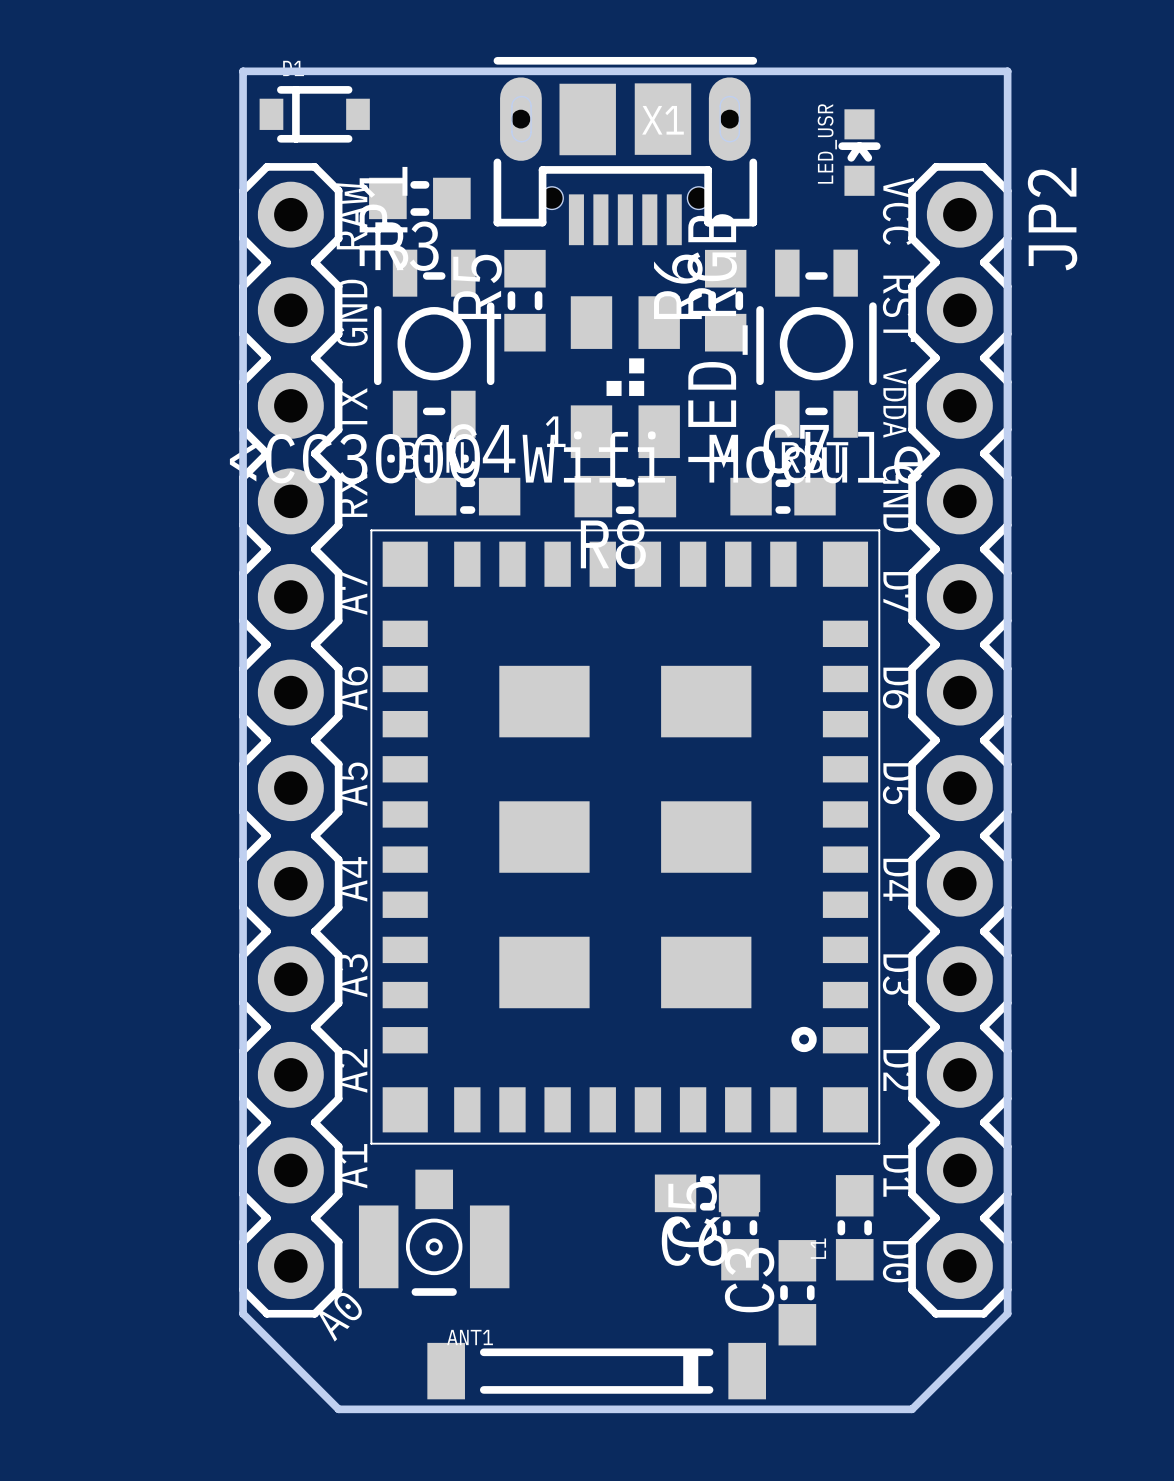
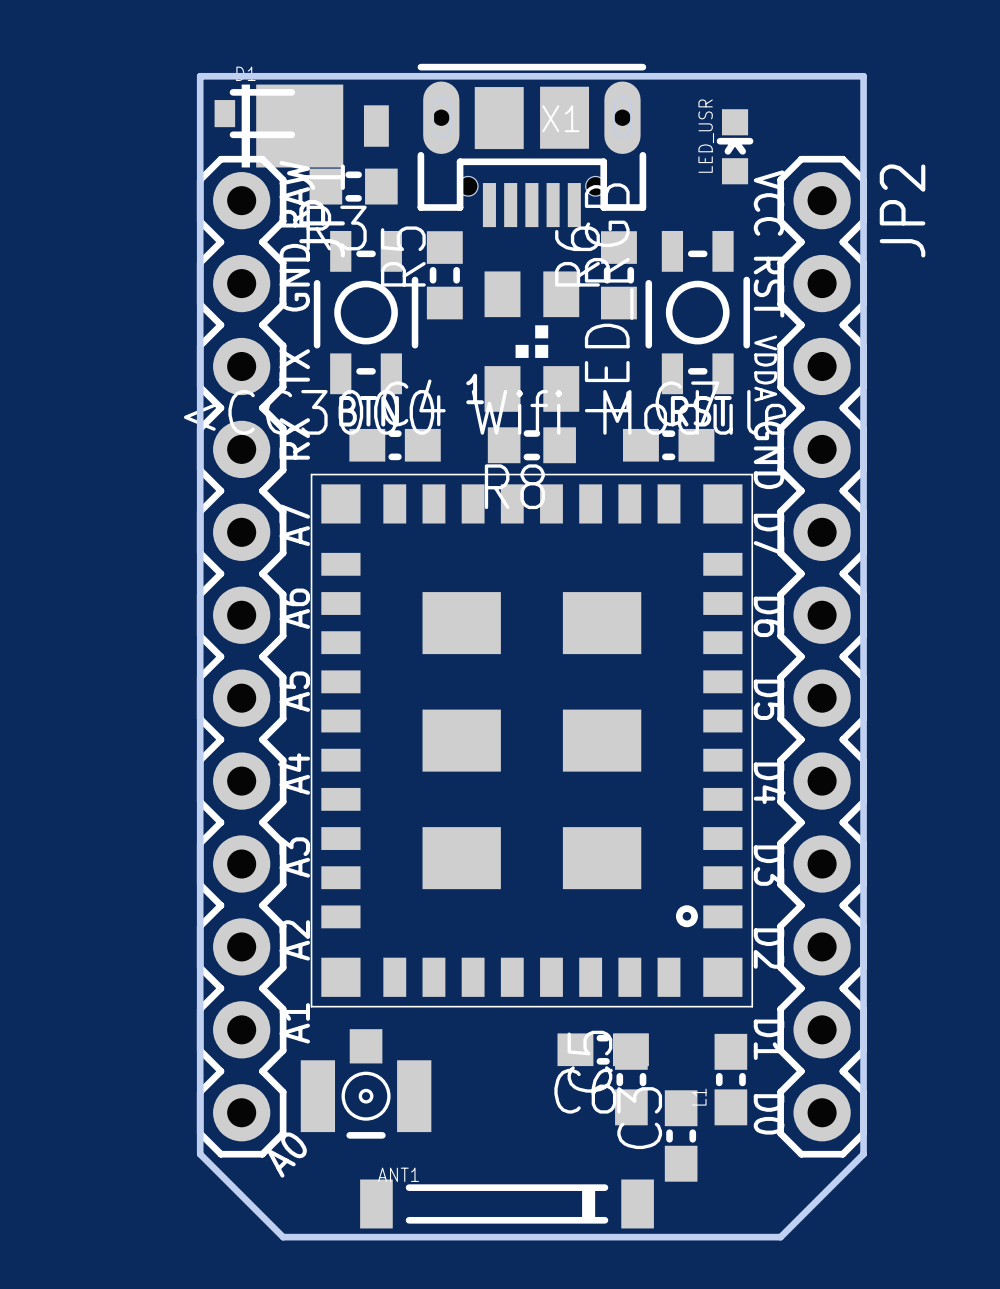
part: none -> (315, 126)

